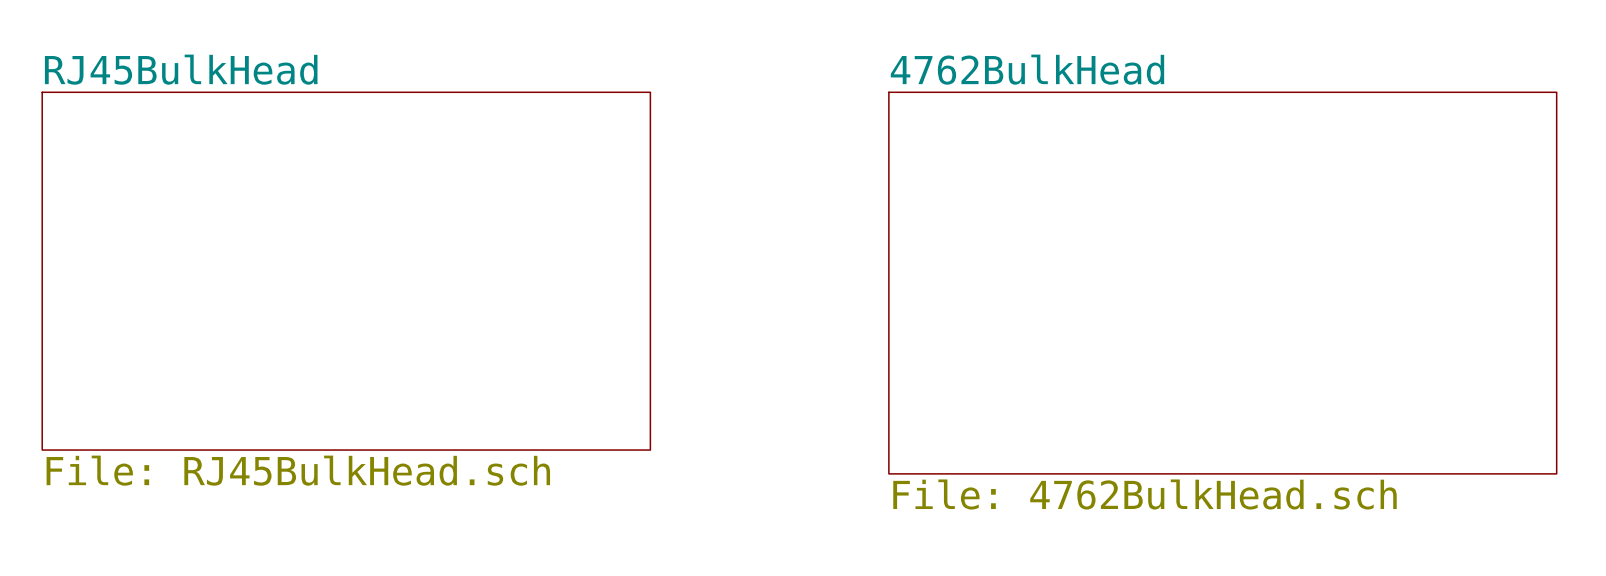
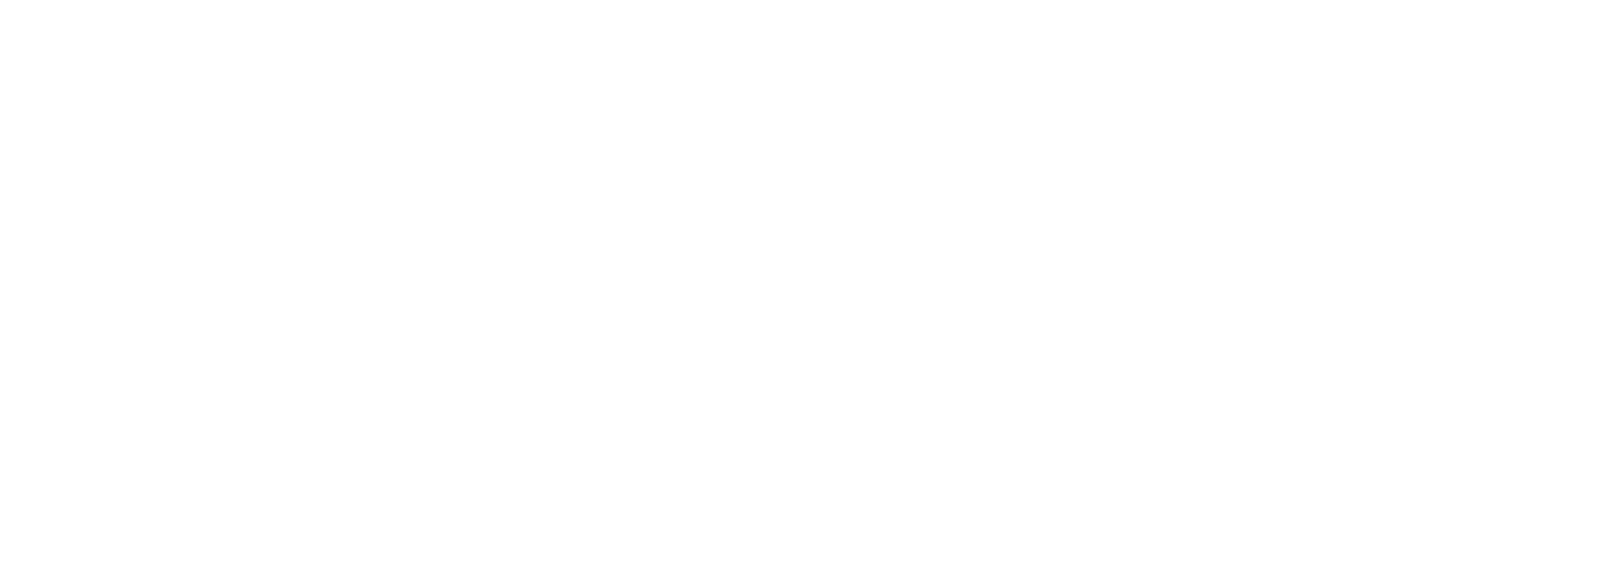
sheet RJ45BulkHead: File: RJ45BulkHead.sch (346, 271) -> none
sheet 4762BulkHead: File: 4762BulkHead.sch (1222, 283) -> none

